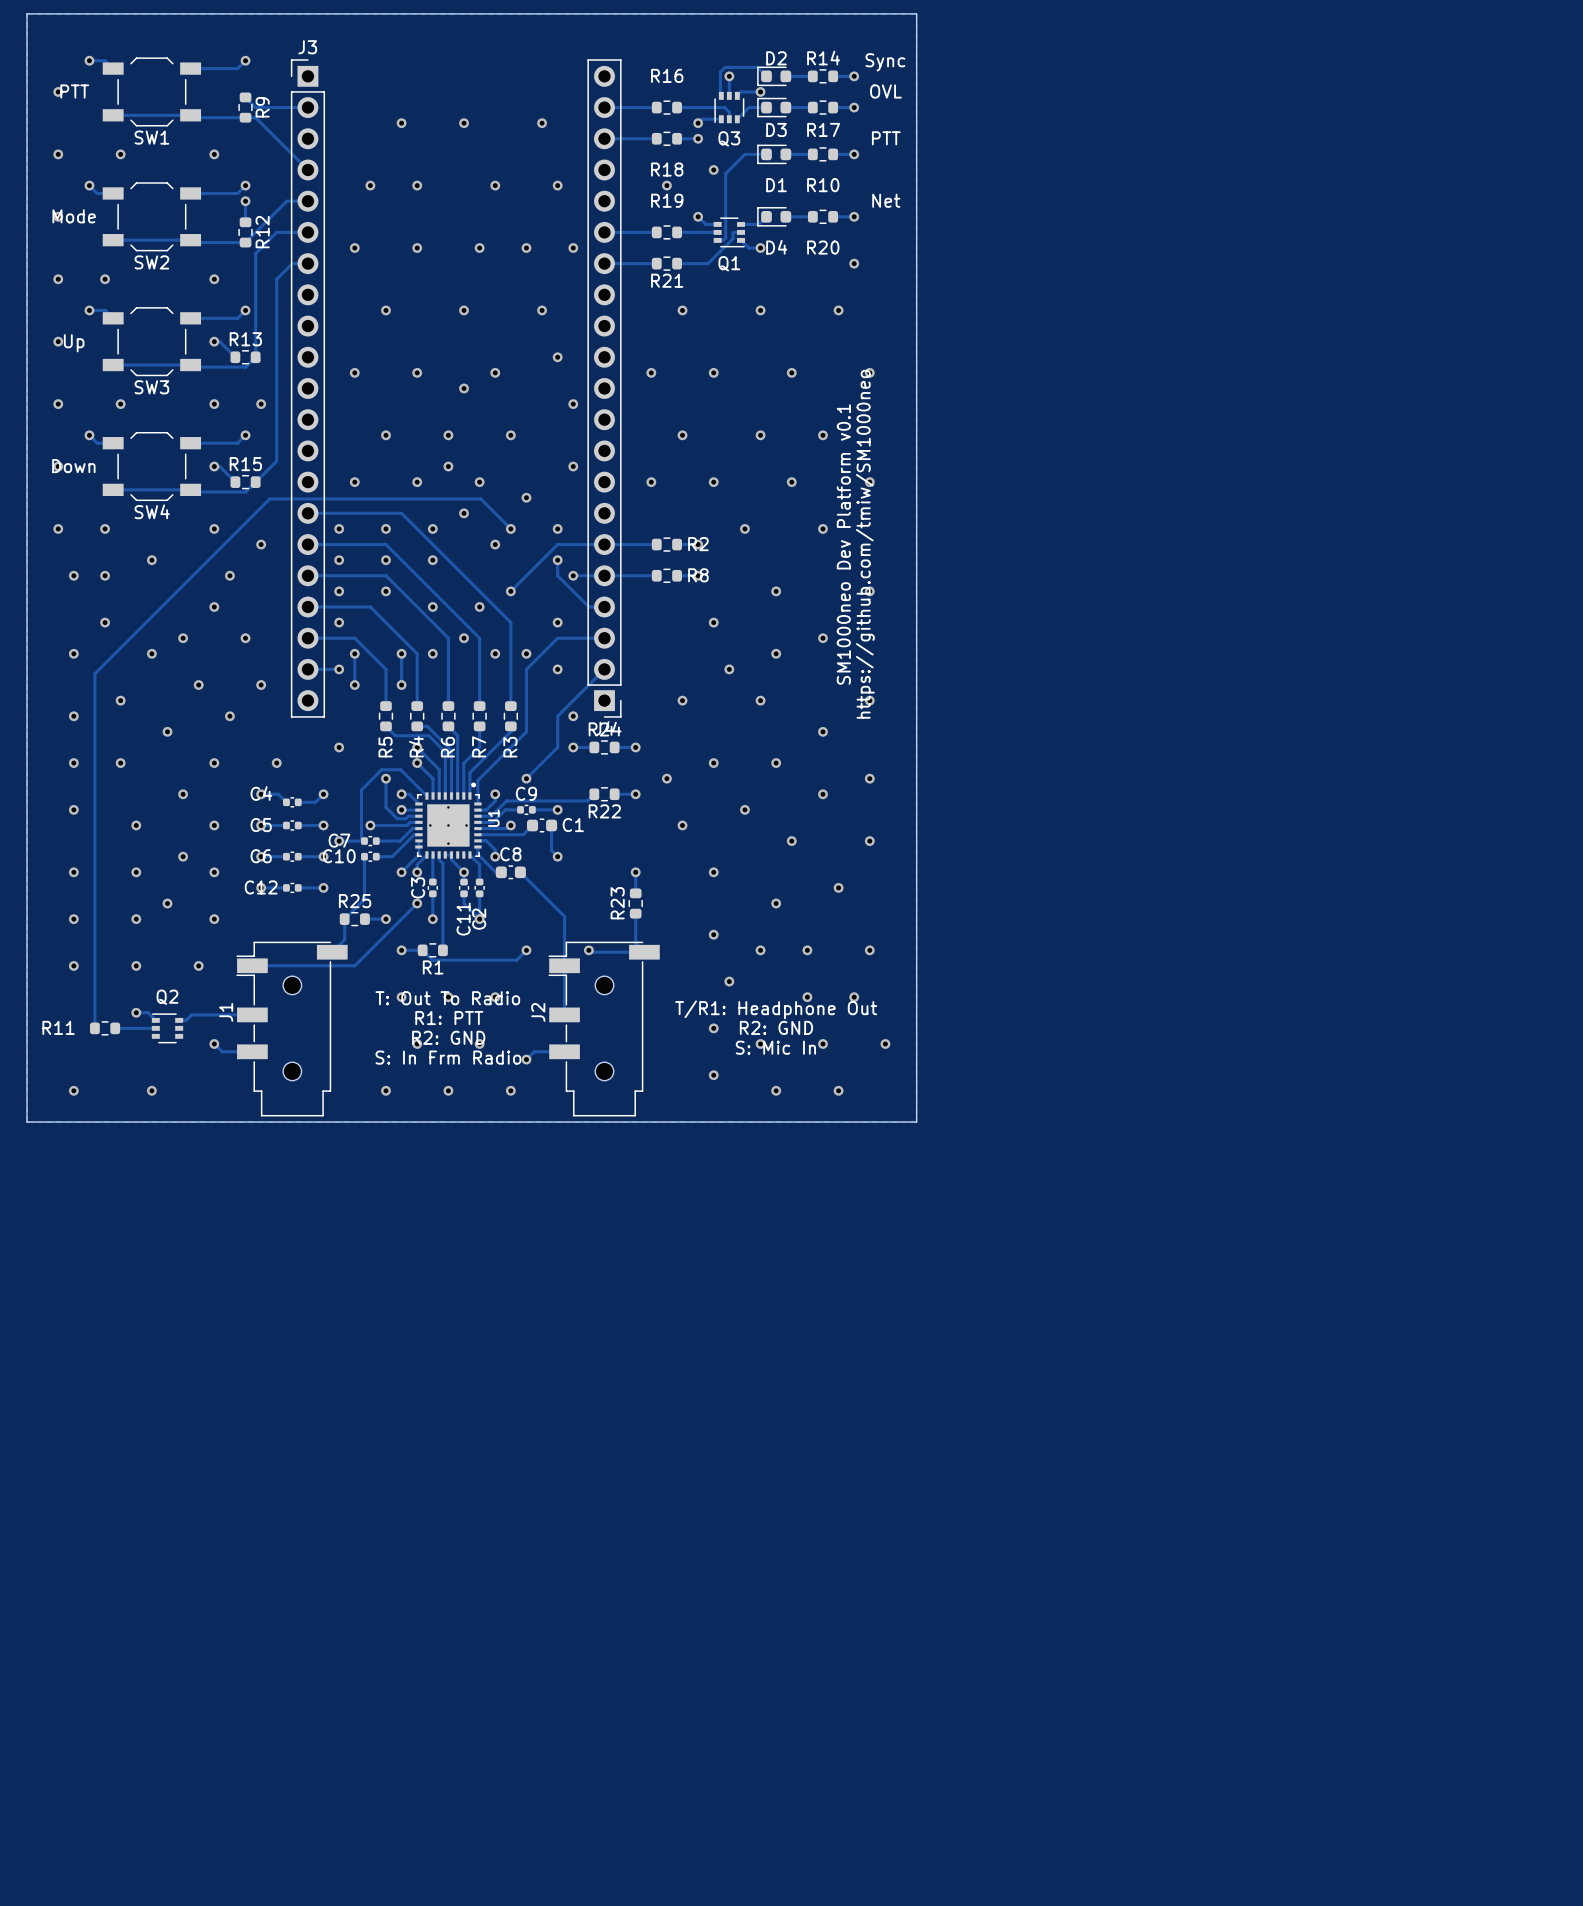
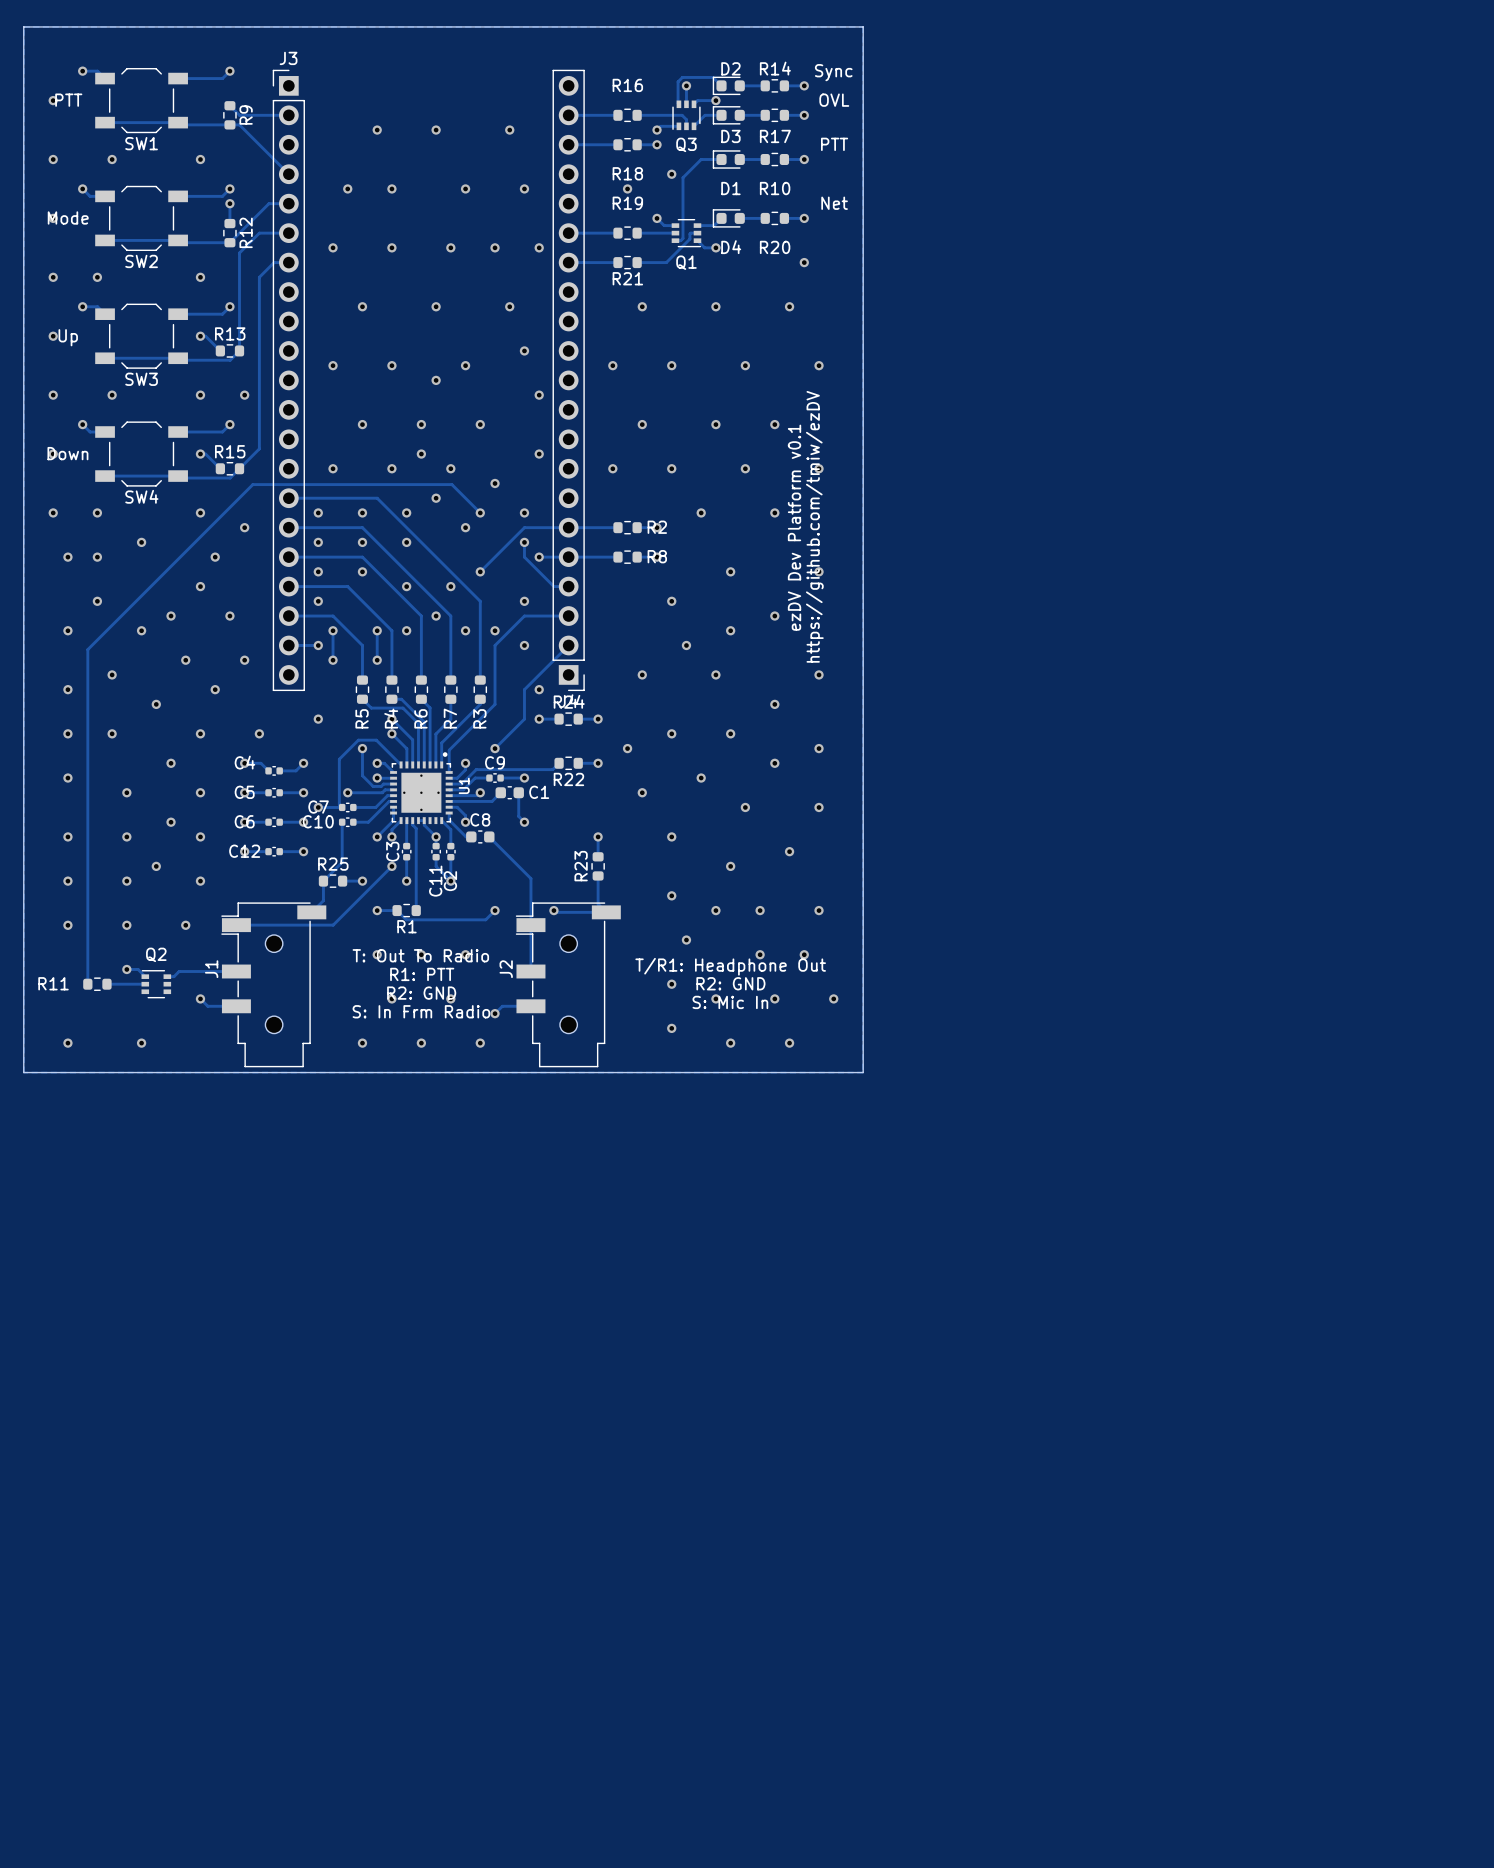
text: SM1000neo Dev Platform v0.1 (843, 544) -> ezDV Dev Platform v0.1 (794, 527)
text: https://github.com/tmiw/SM1000neo (865, 544) -> https://github.com/tmiw/ezDV (814, 526)

